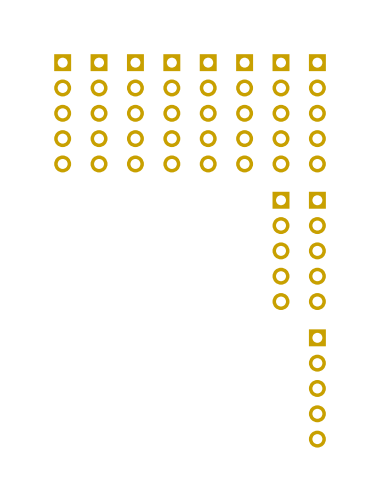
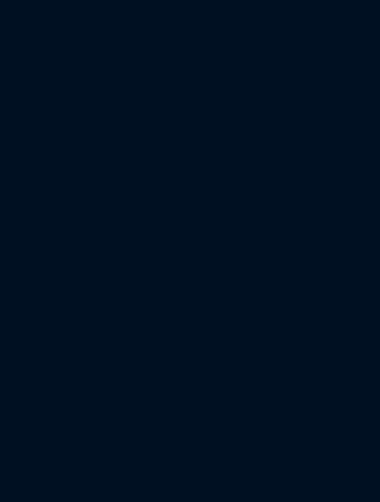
part: (62, 113) -> none
part: (99, 113) -> none
part: (135, 113) -> none
part: (171, 113) -> none
part: (208, 113) -> none
part: (244, 113) -> none
part: (281, 113) -> none
part: (317, 113) -> none
part: (281, 250) -> none
part: (317, 250) -> none
part: (317, 388) -> none

